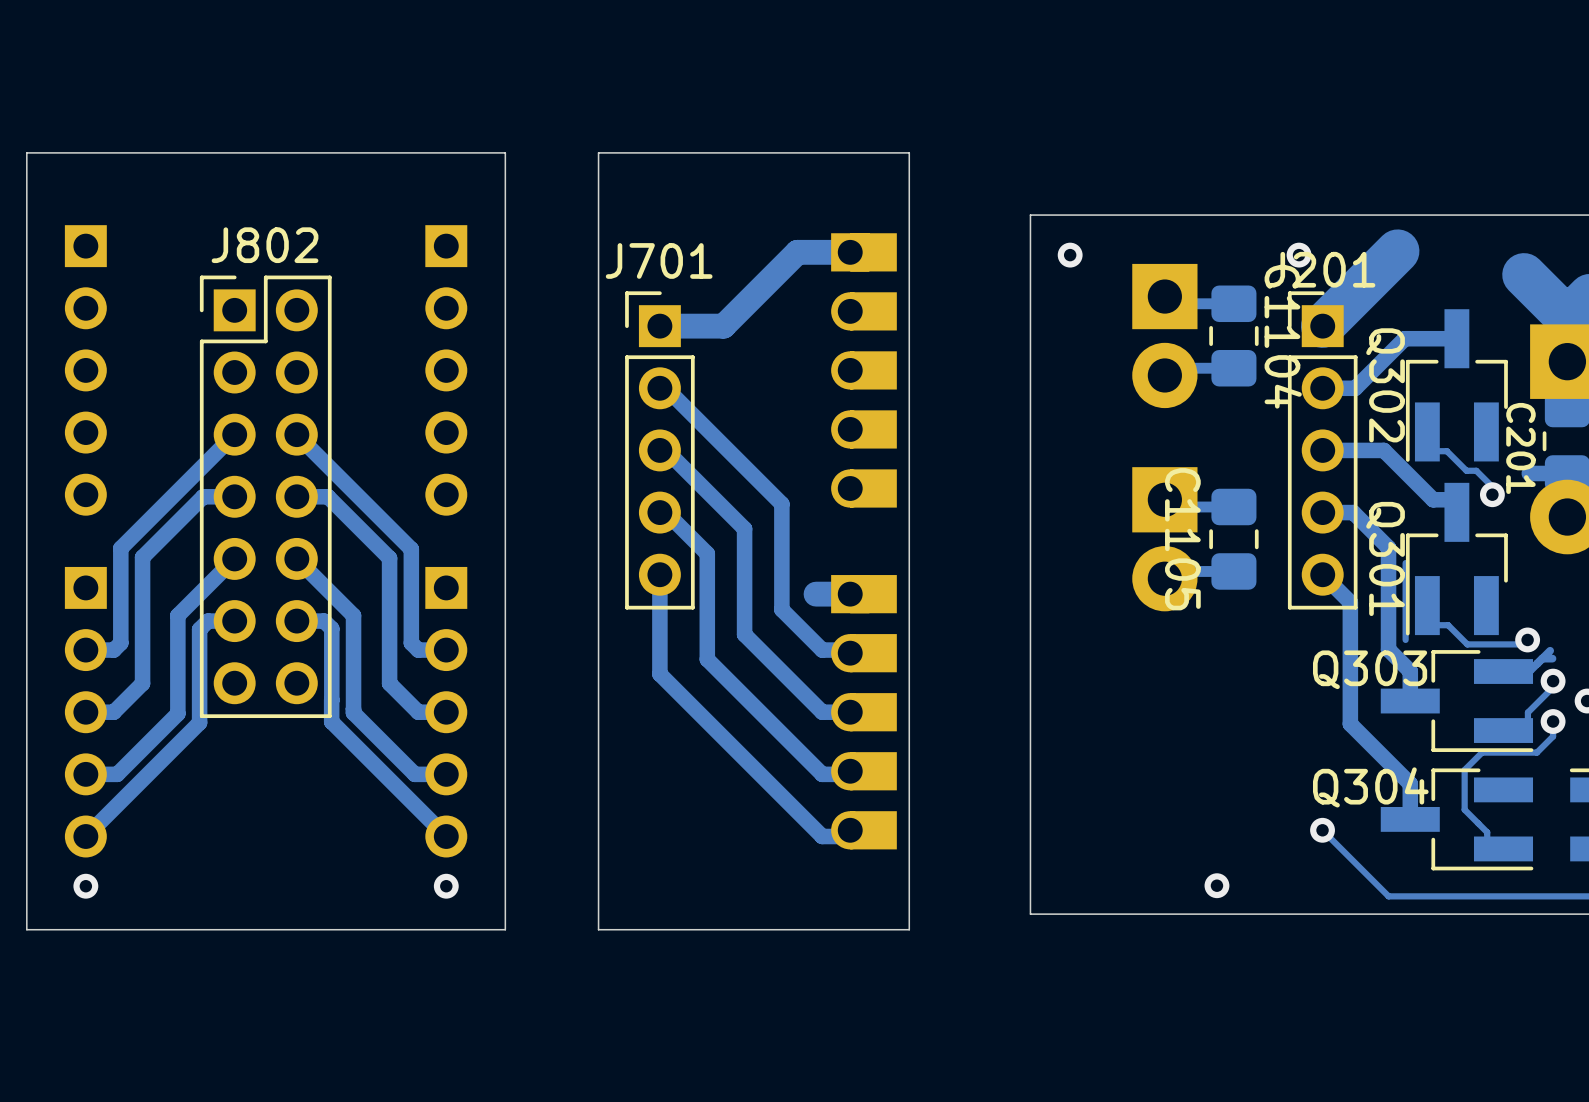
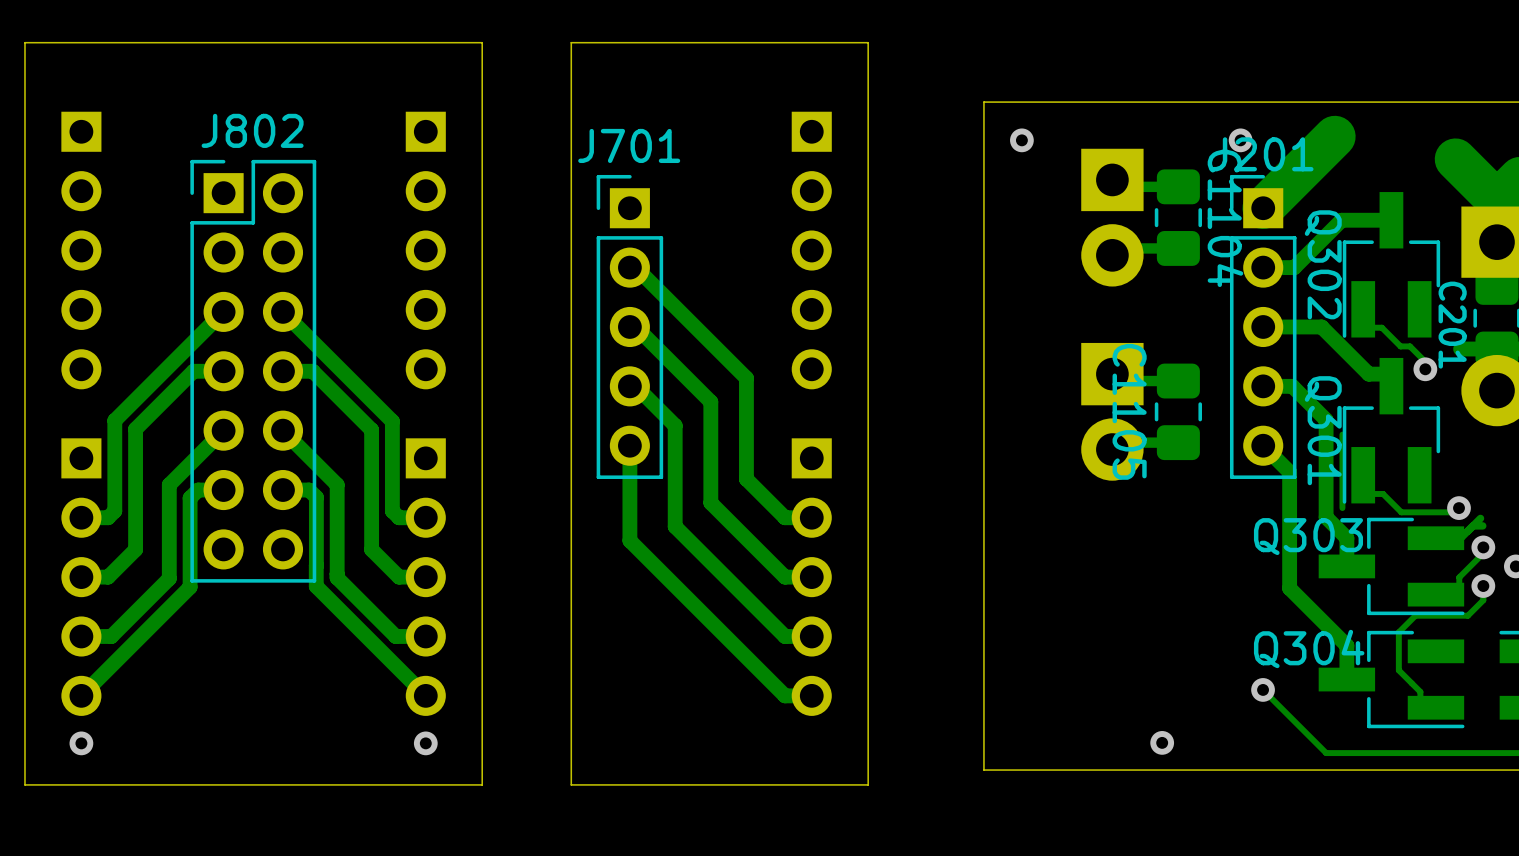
part footprint: [831, 233, 897, 508] -> [791, 111, 832, 390]
track: (850, 252) (797, 252) (723, 326) (659, 326) -> none
part footprint: [831, 575, 897, 850] -> [791, 438, 832, 716]
track: (850, 594) (816, 594) -> none

